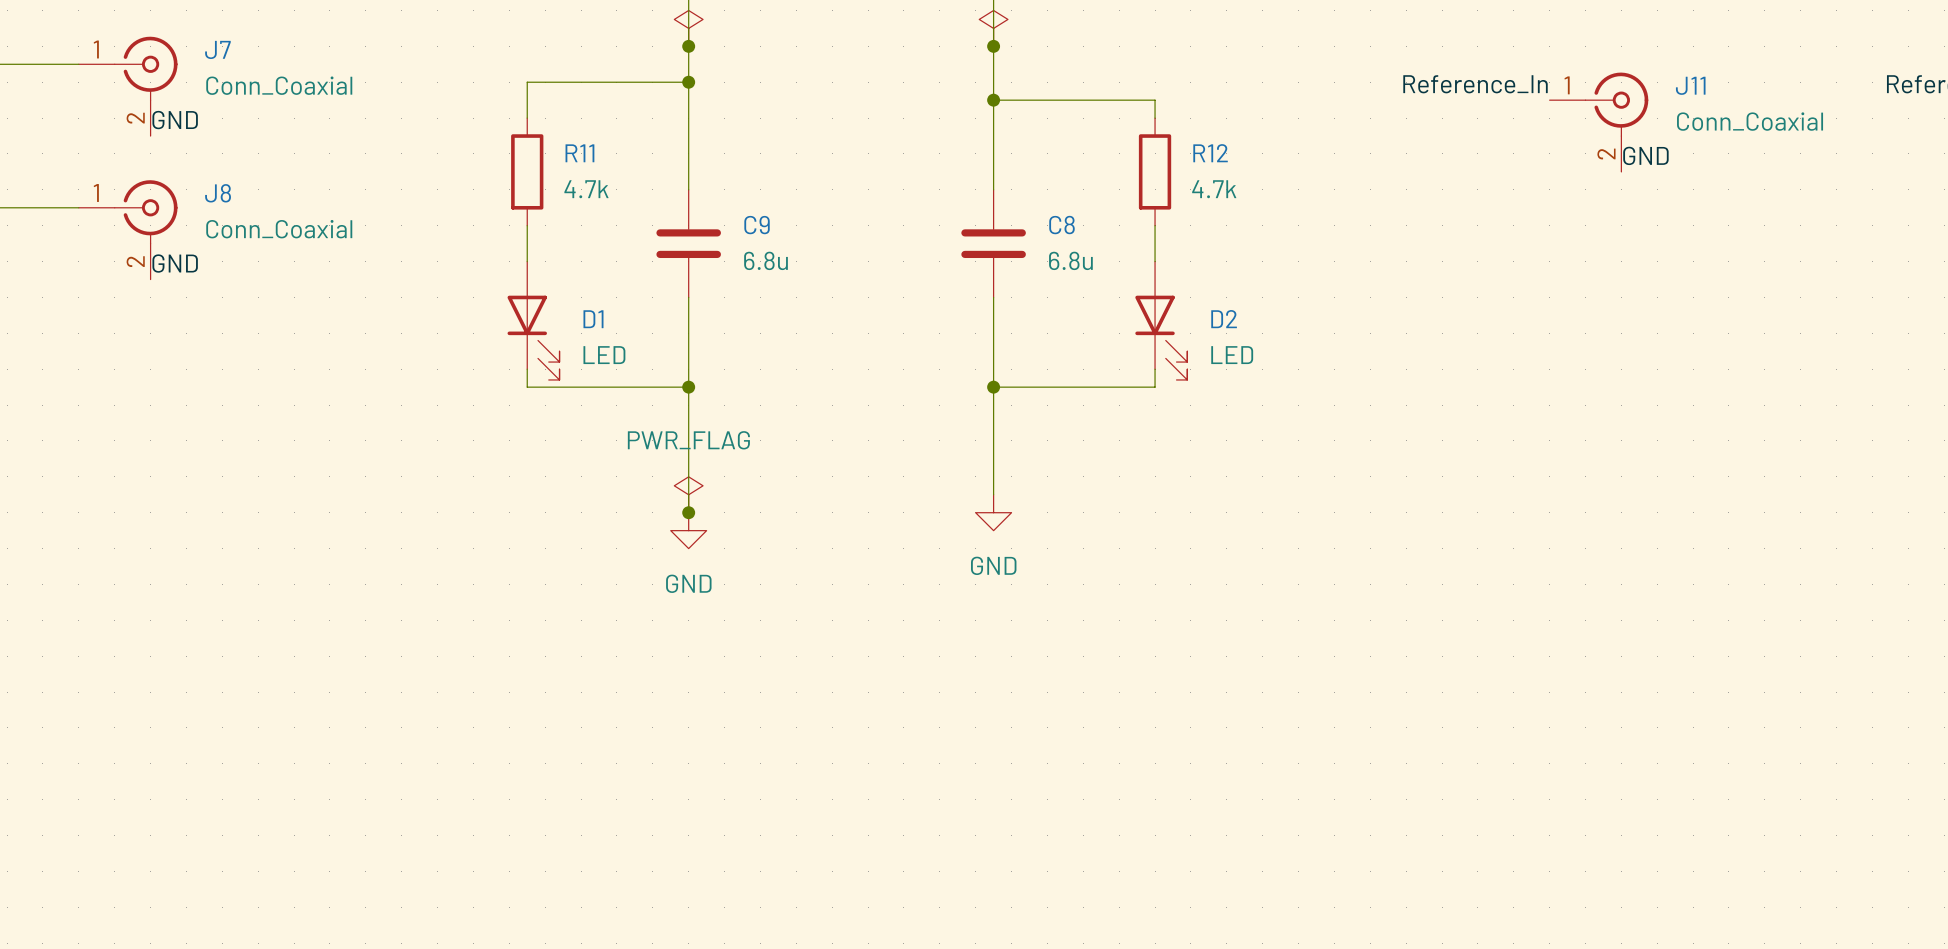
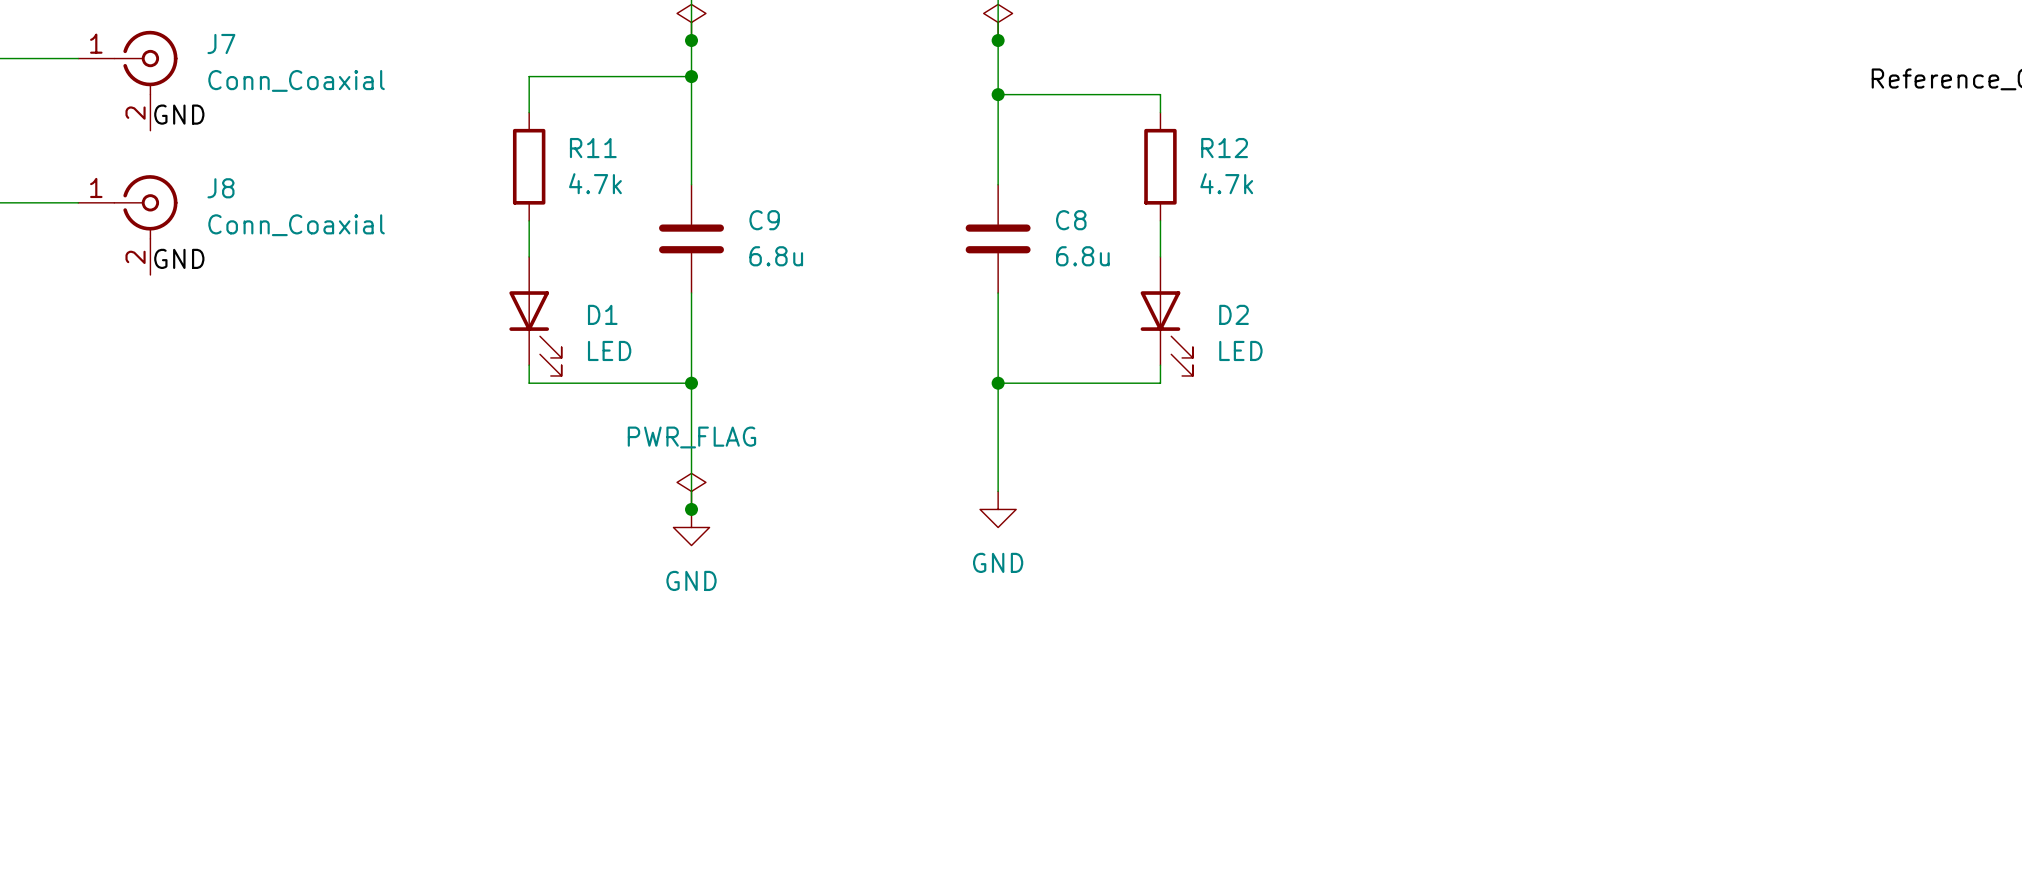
label: Reference_In (1475, 84) -> none
J11: Conn_Coaxial (1598, 122) -> none
label: GND (1645, 155) -> none

